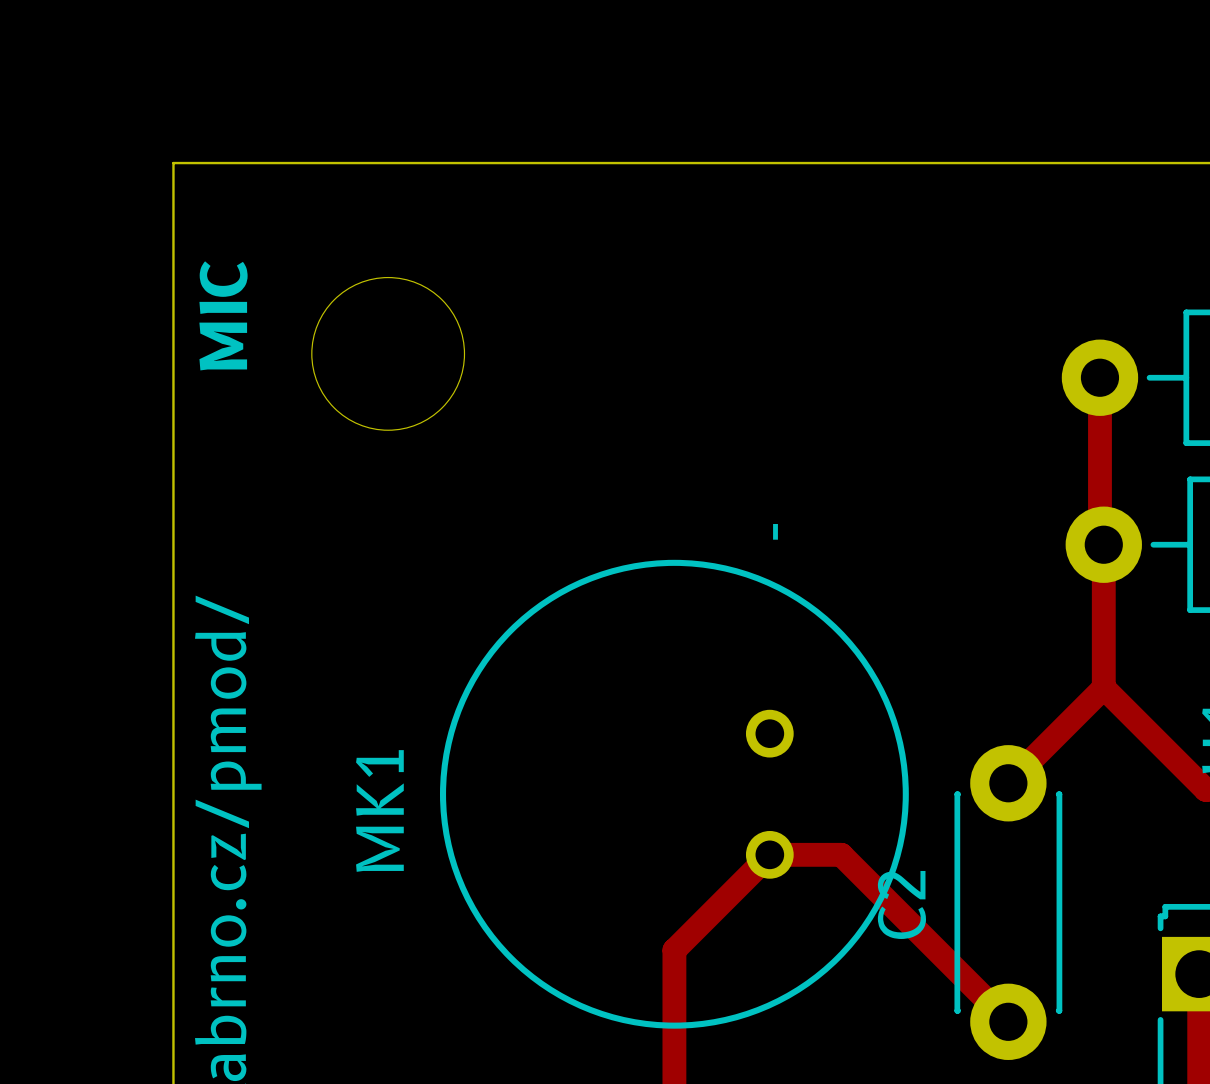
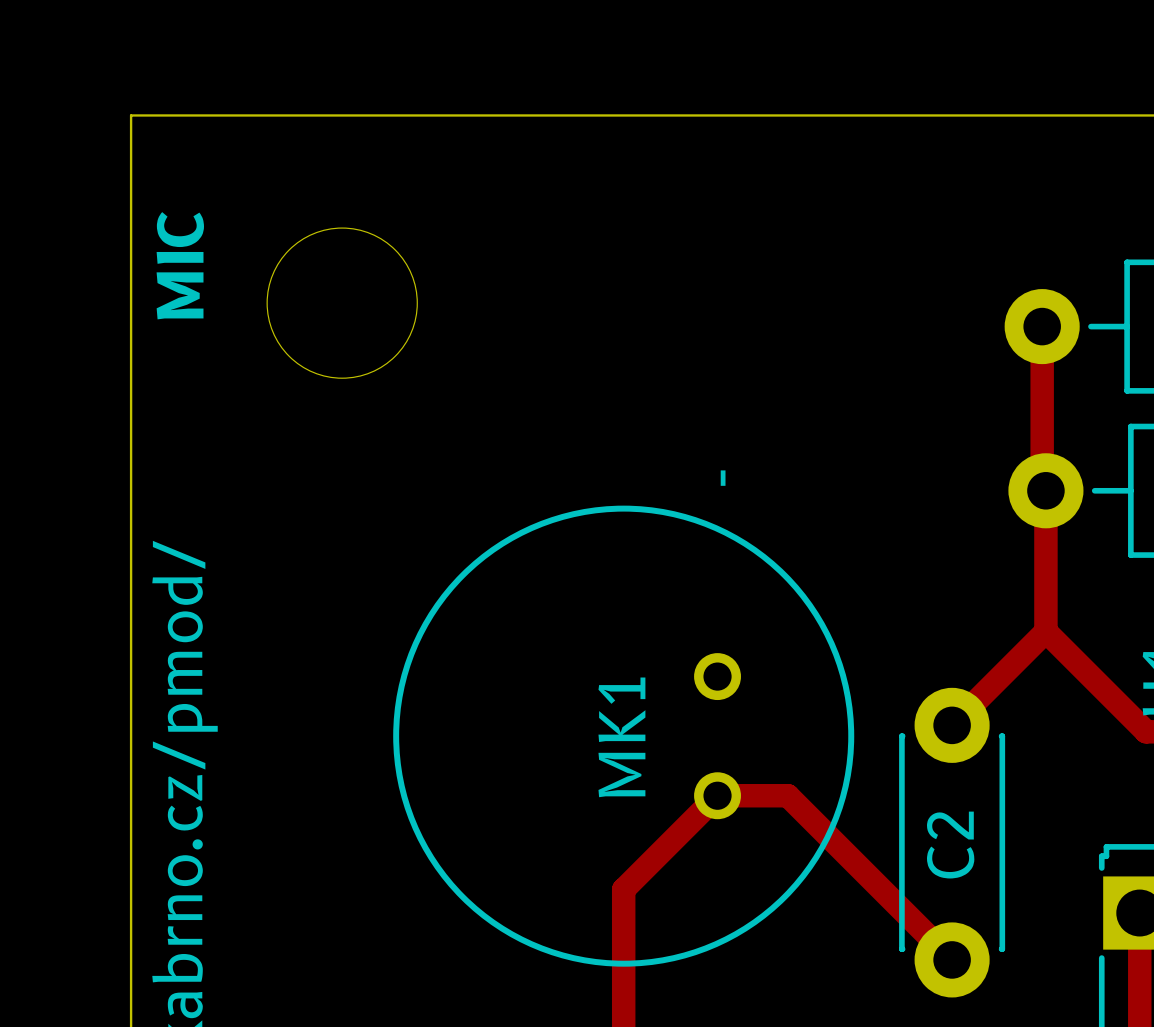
MK1 name position: MK1 (379, 810) -> MK1 (621, 737)
C2 name position: C2 (901, 904) -> C2 (950, 845)

